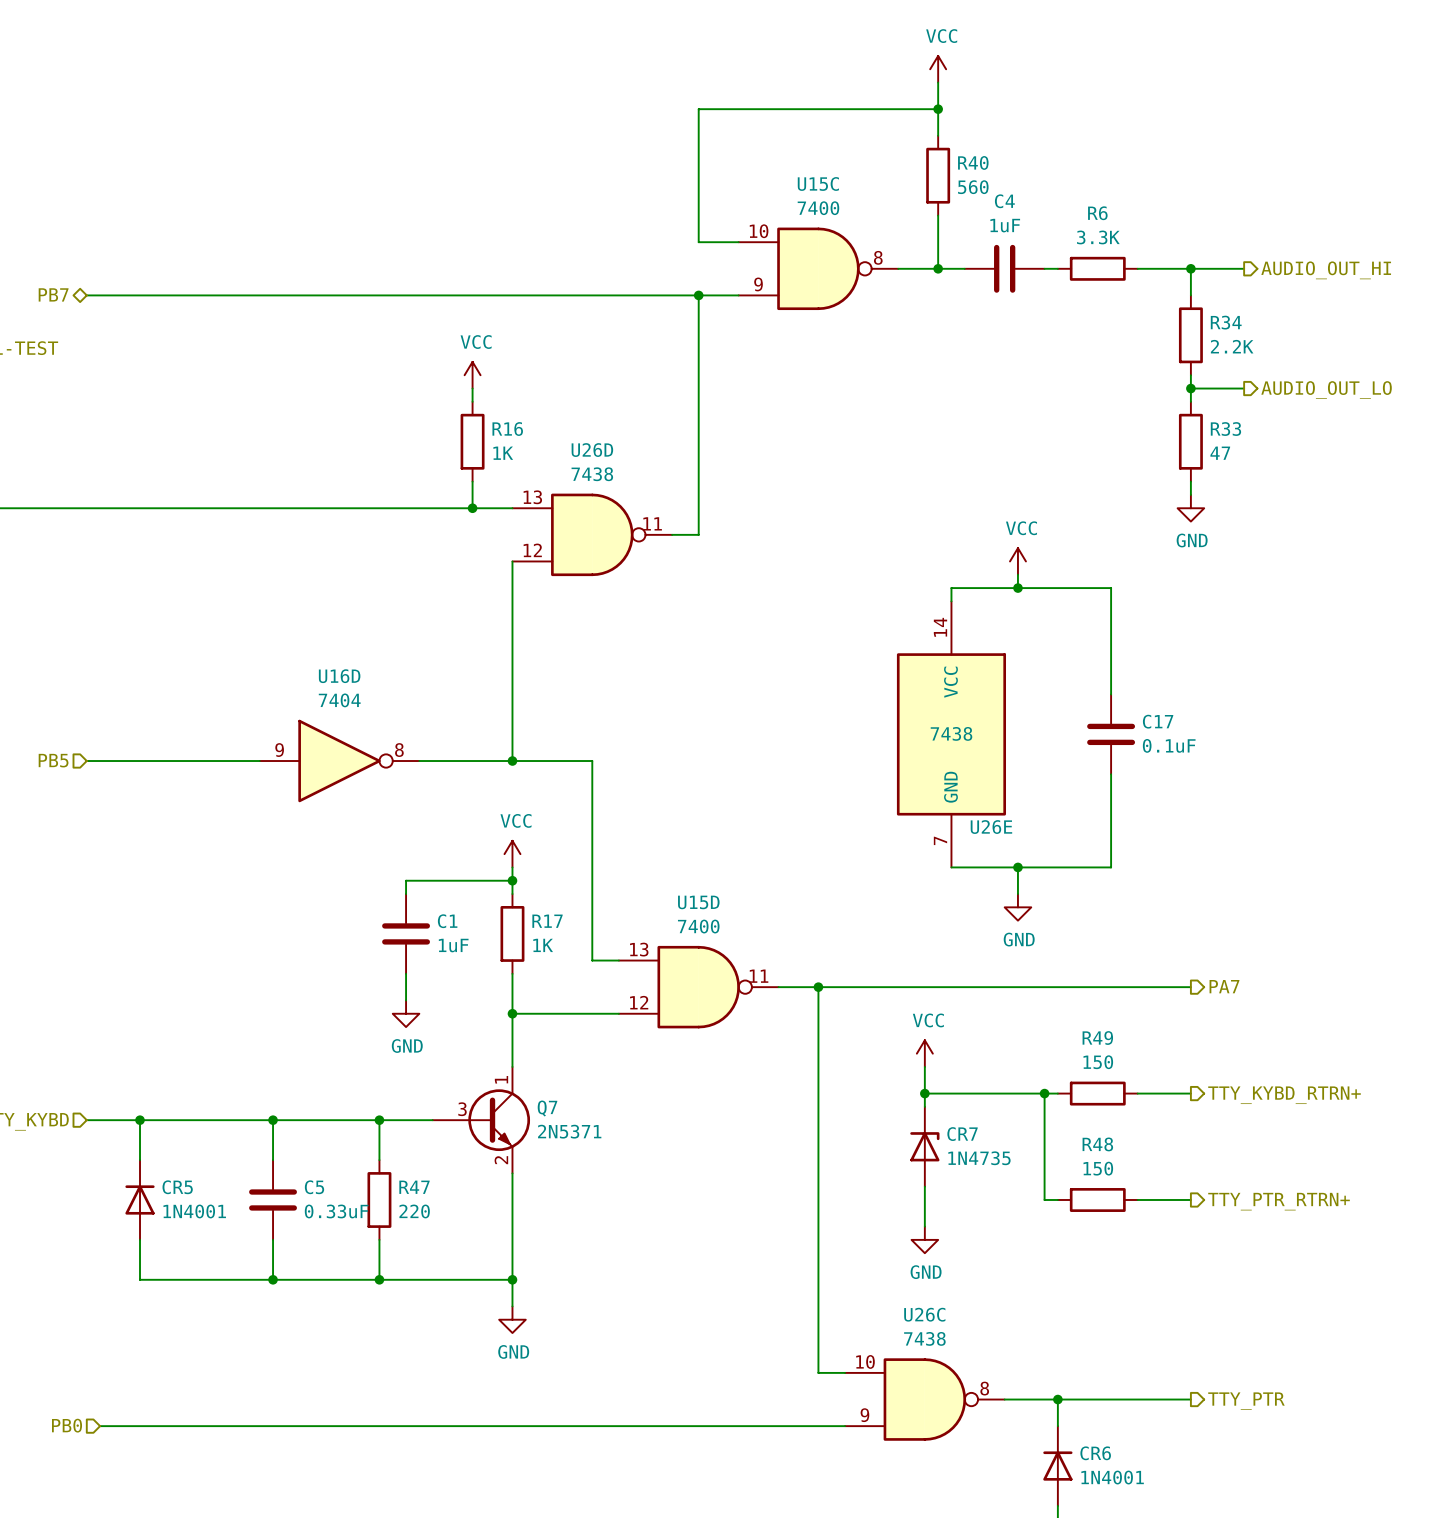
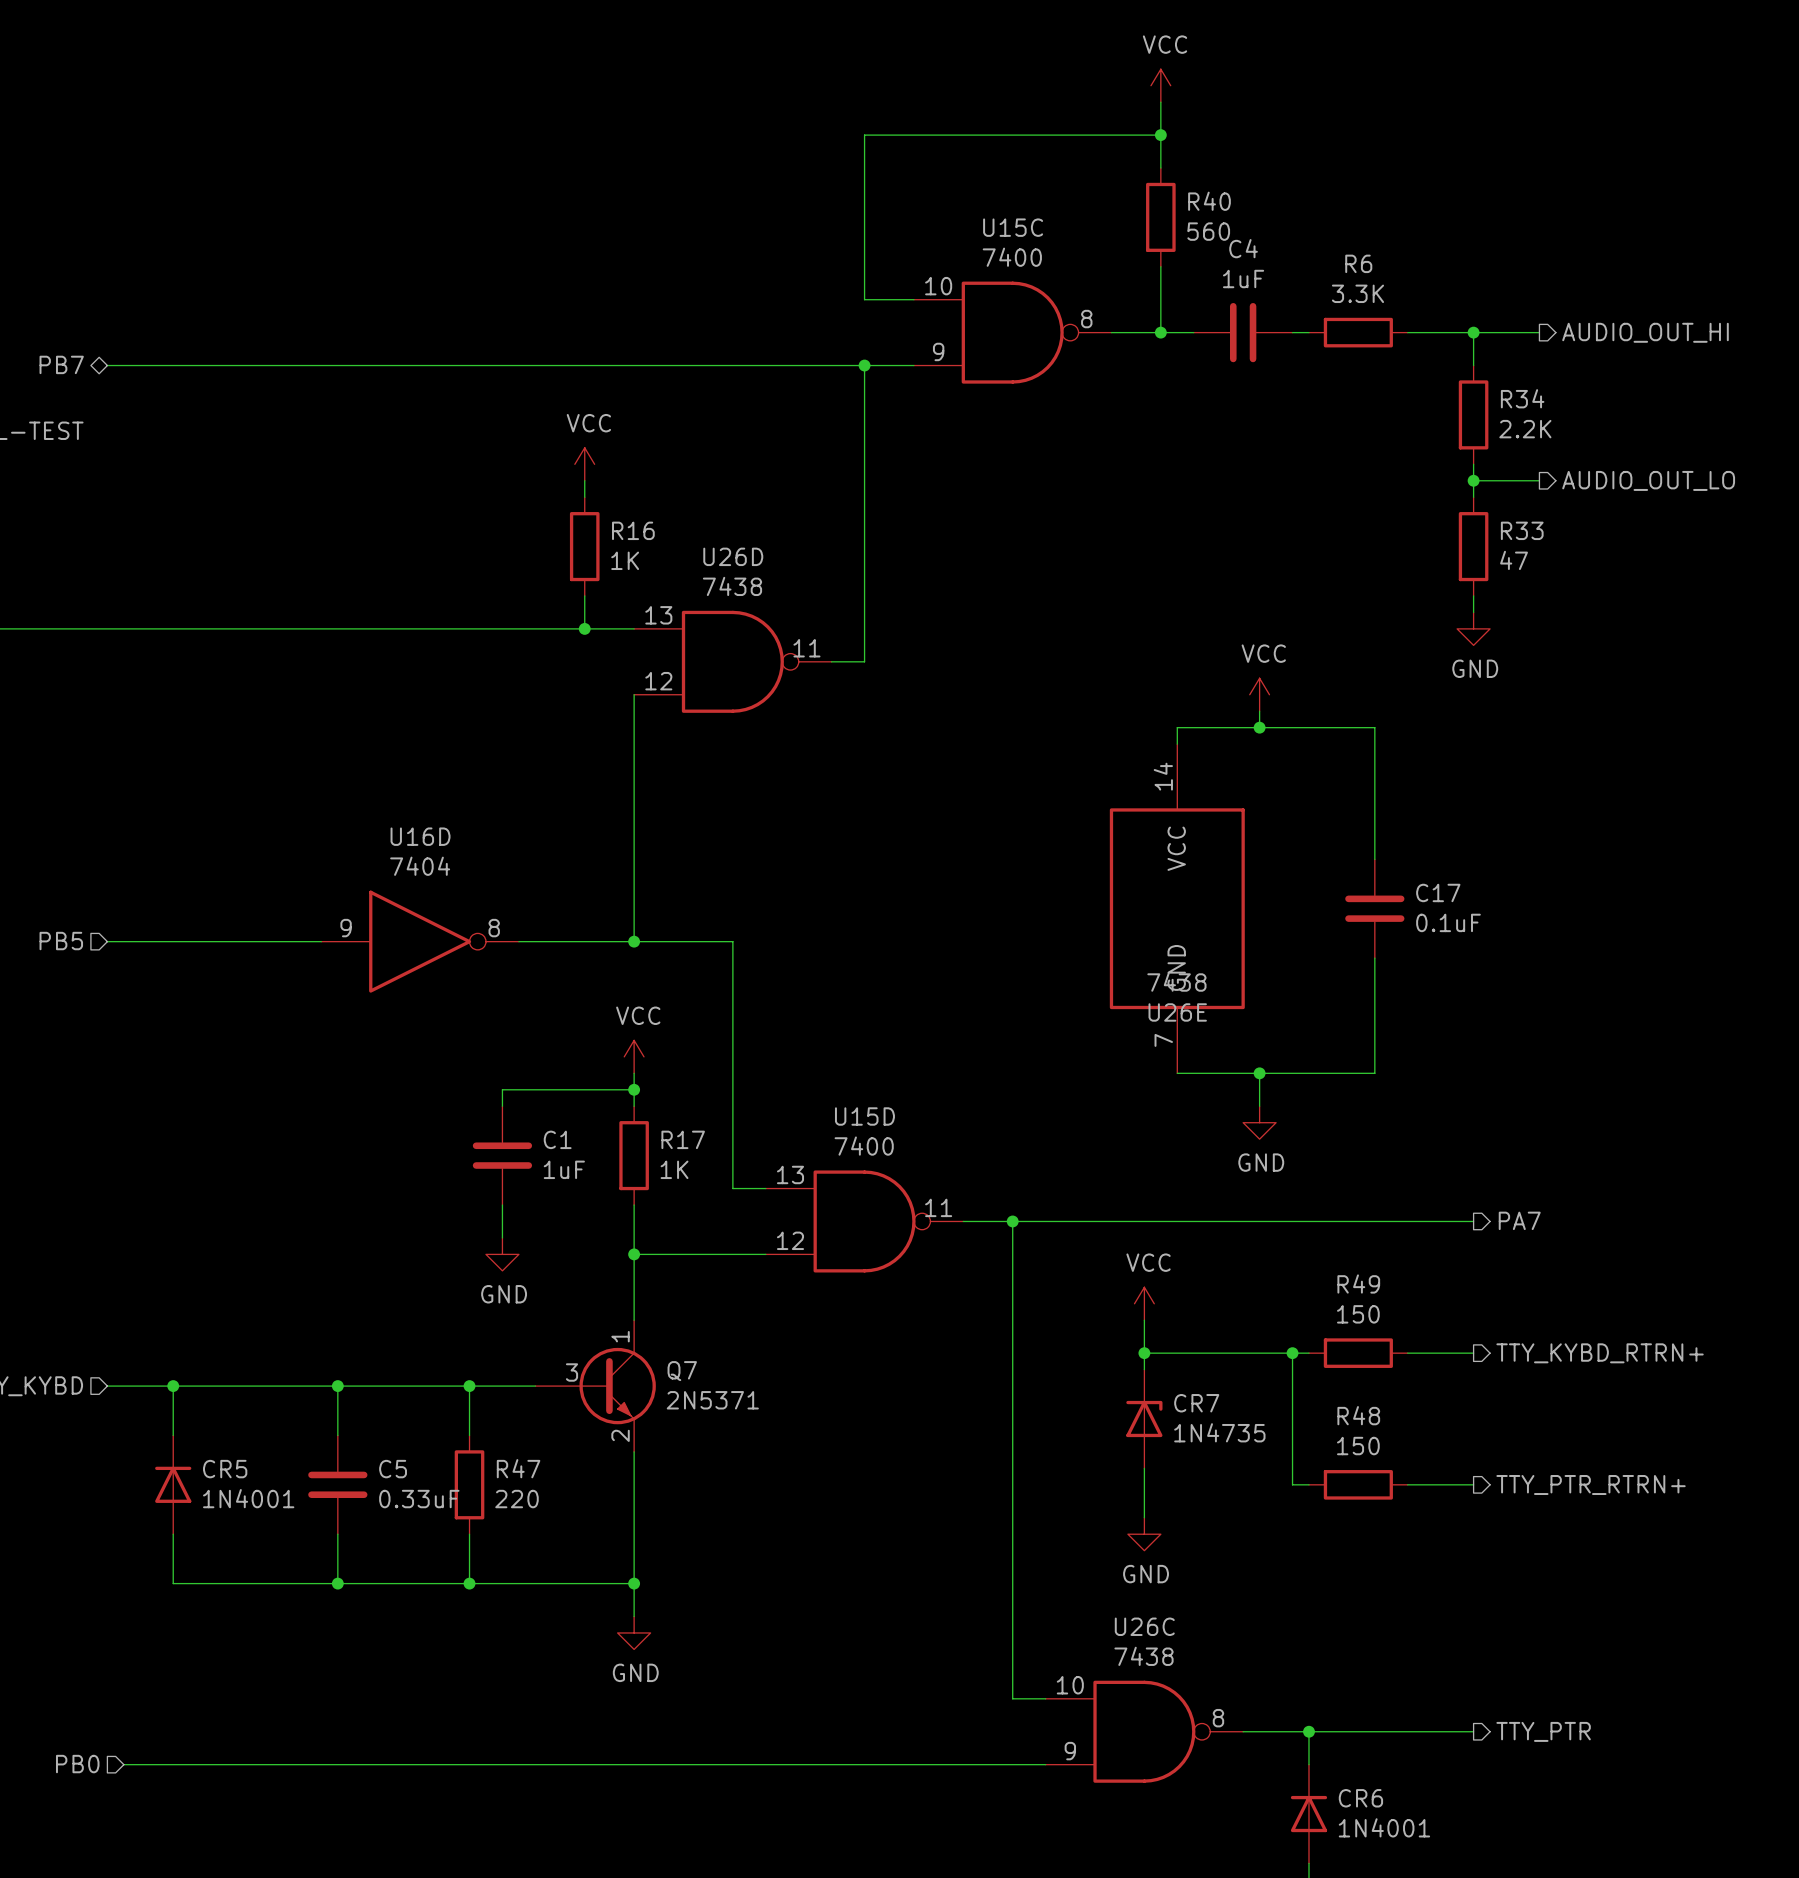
U26E value position: 7438 (951, 733) -> 7438 (1176, 982)
U26E name position: U26E (991, 827) -> U26E (1177, 1012)

